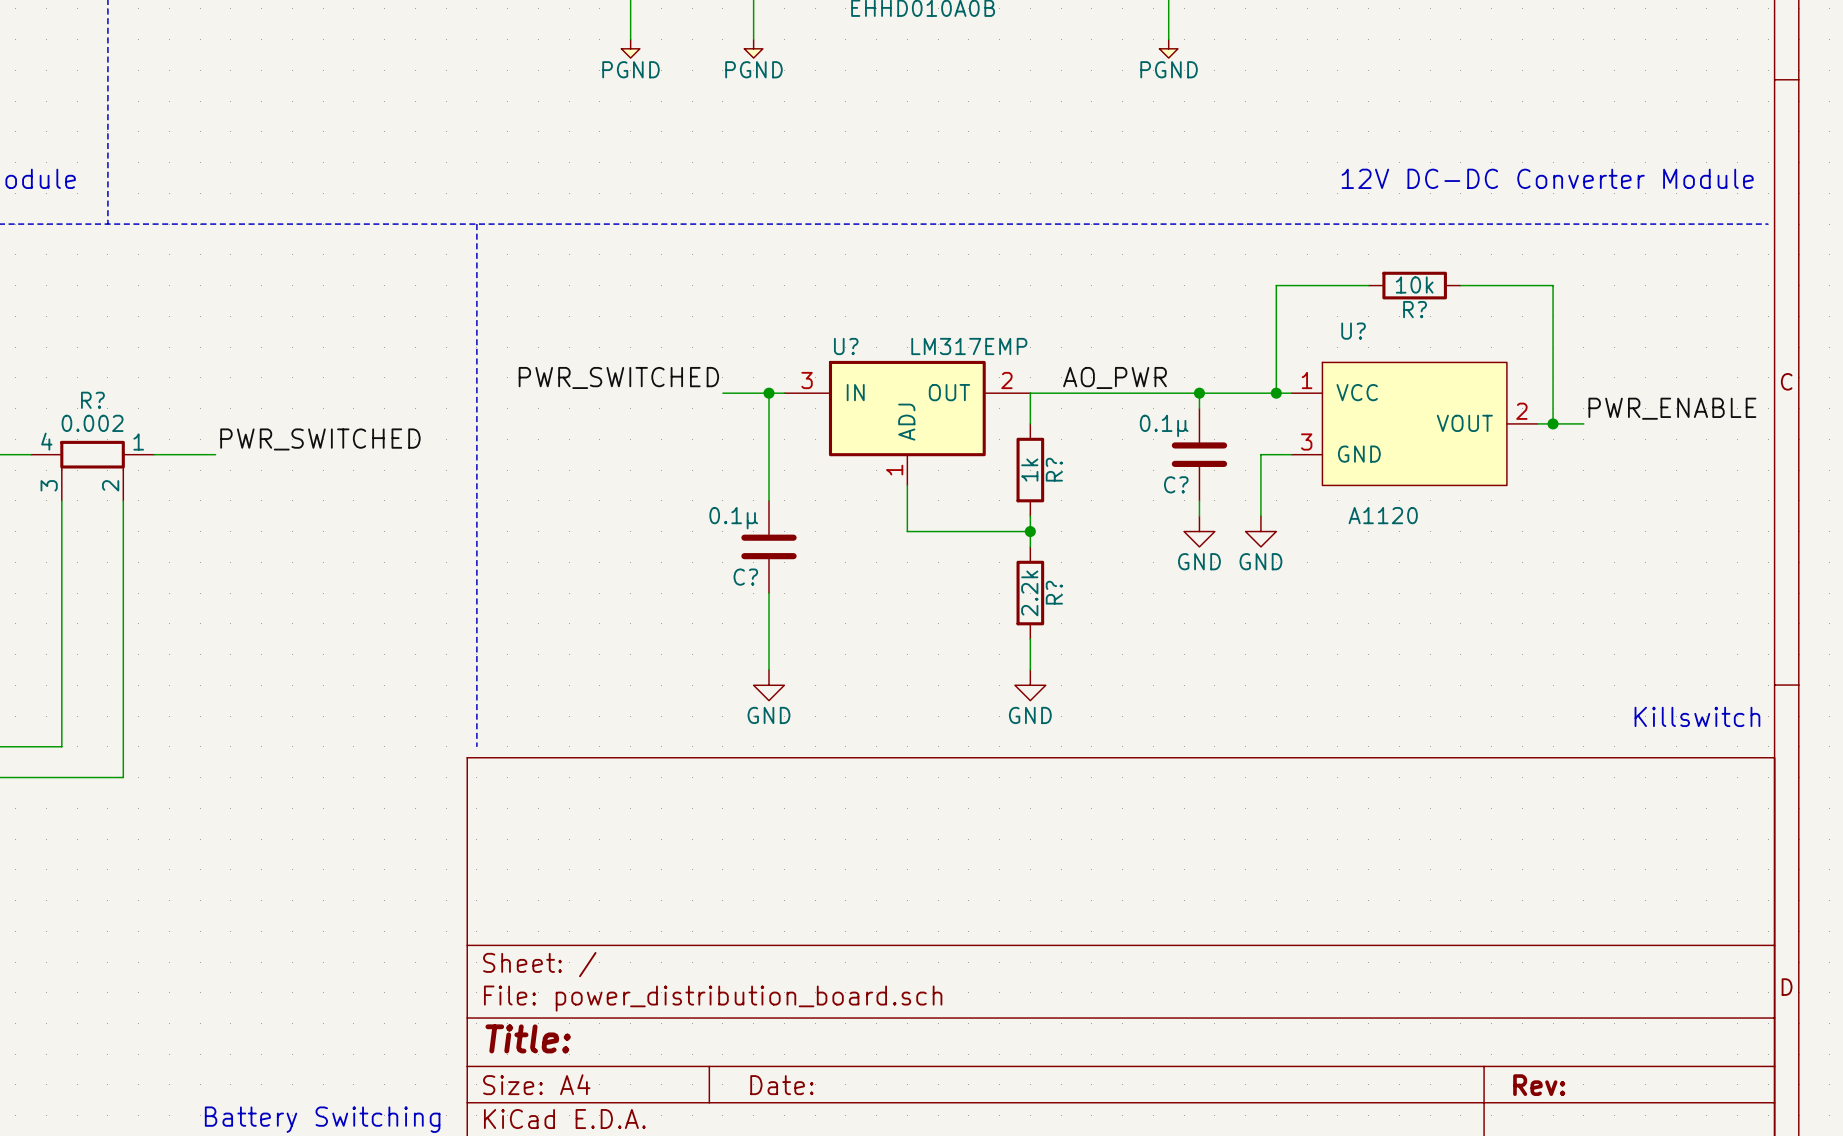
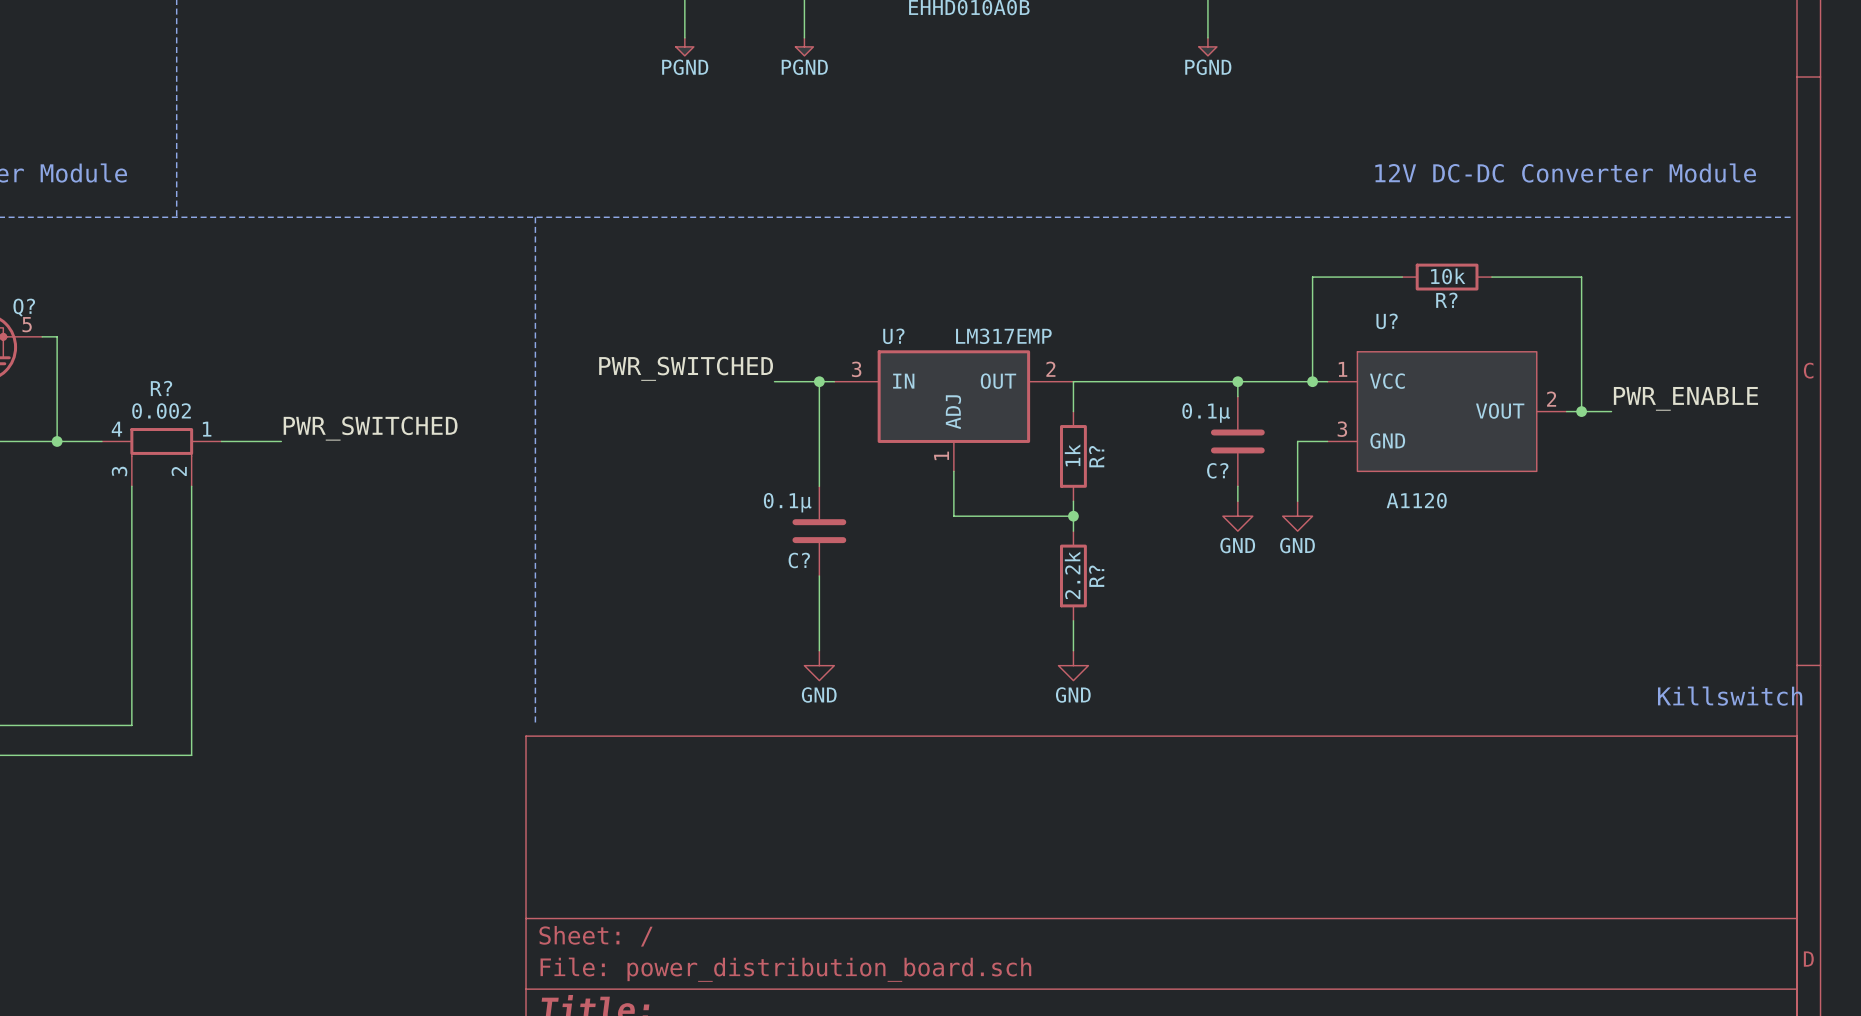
label: AO_PWR (1115, 377) -> none

